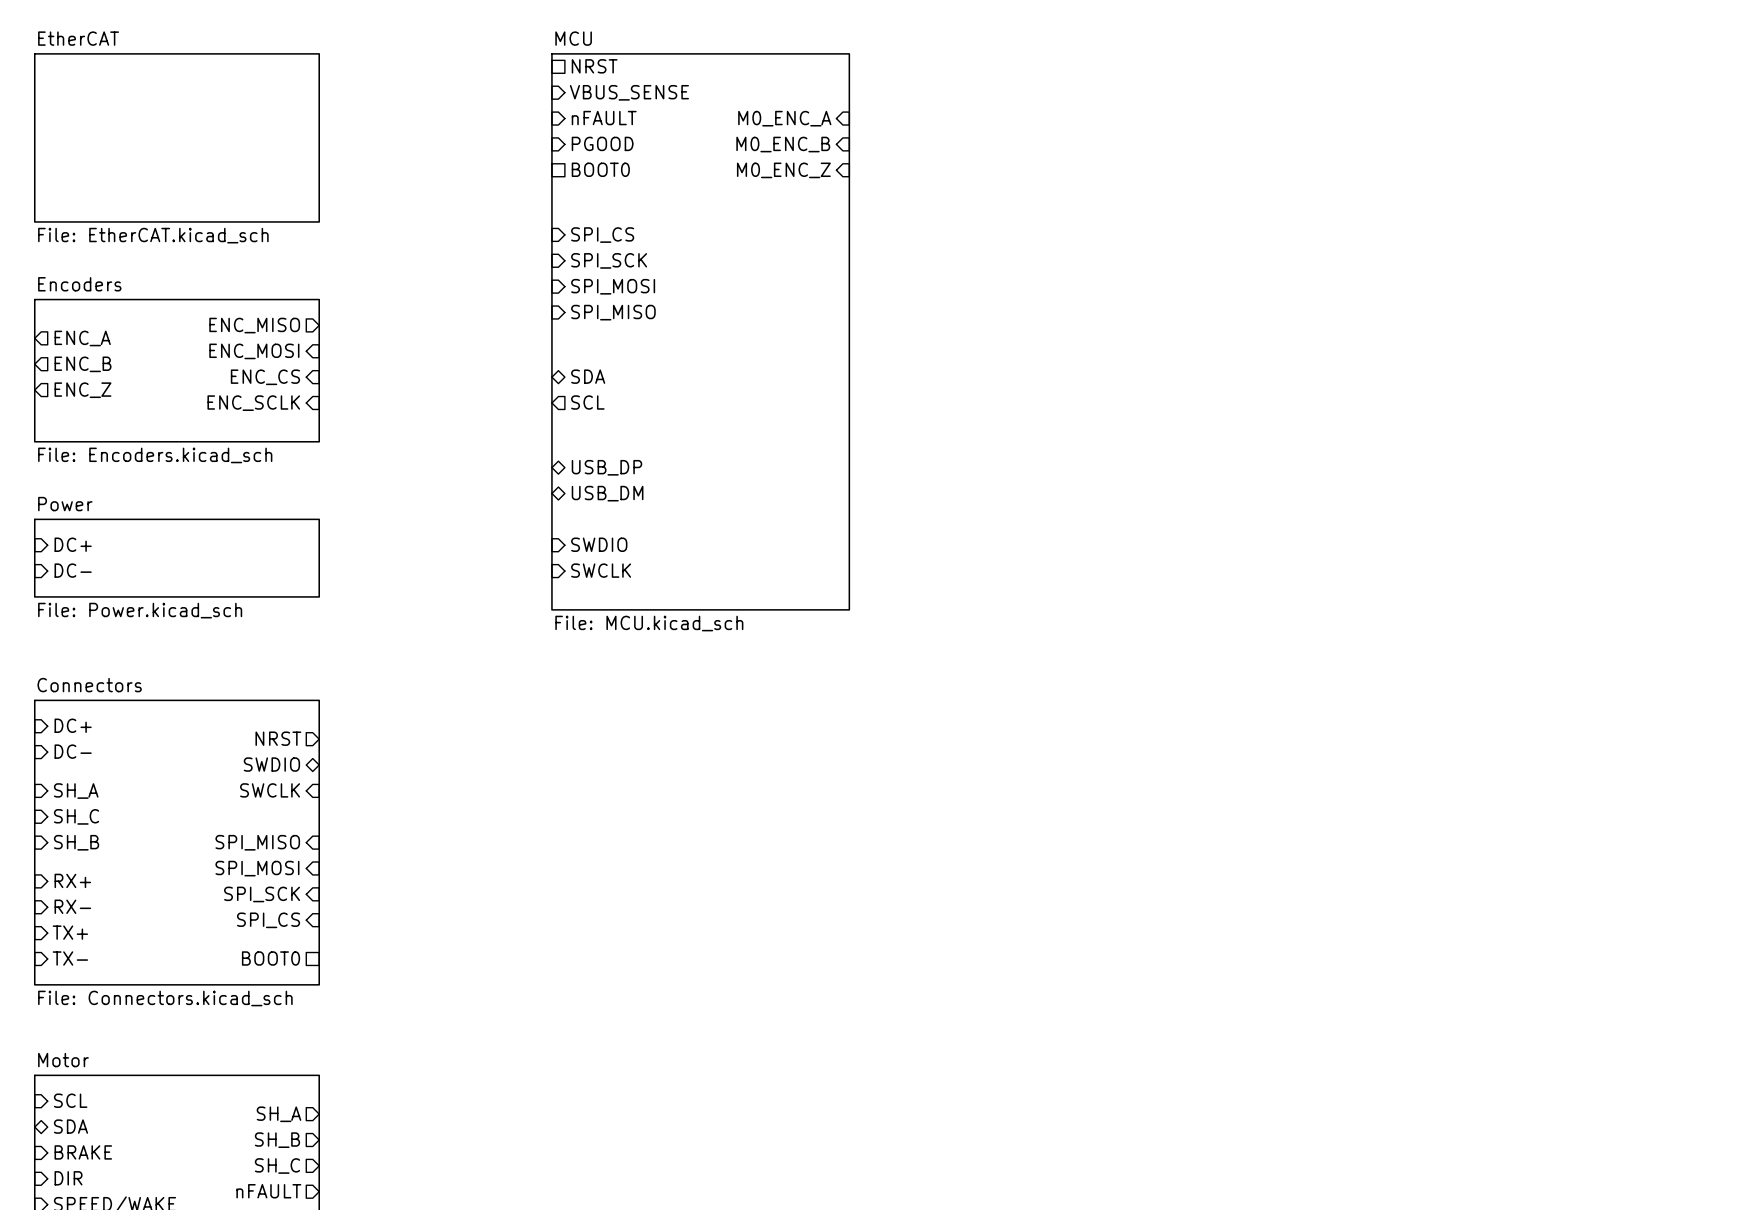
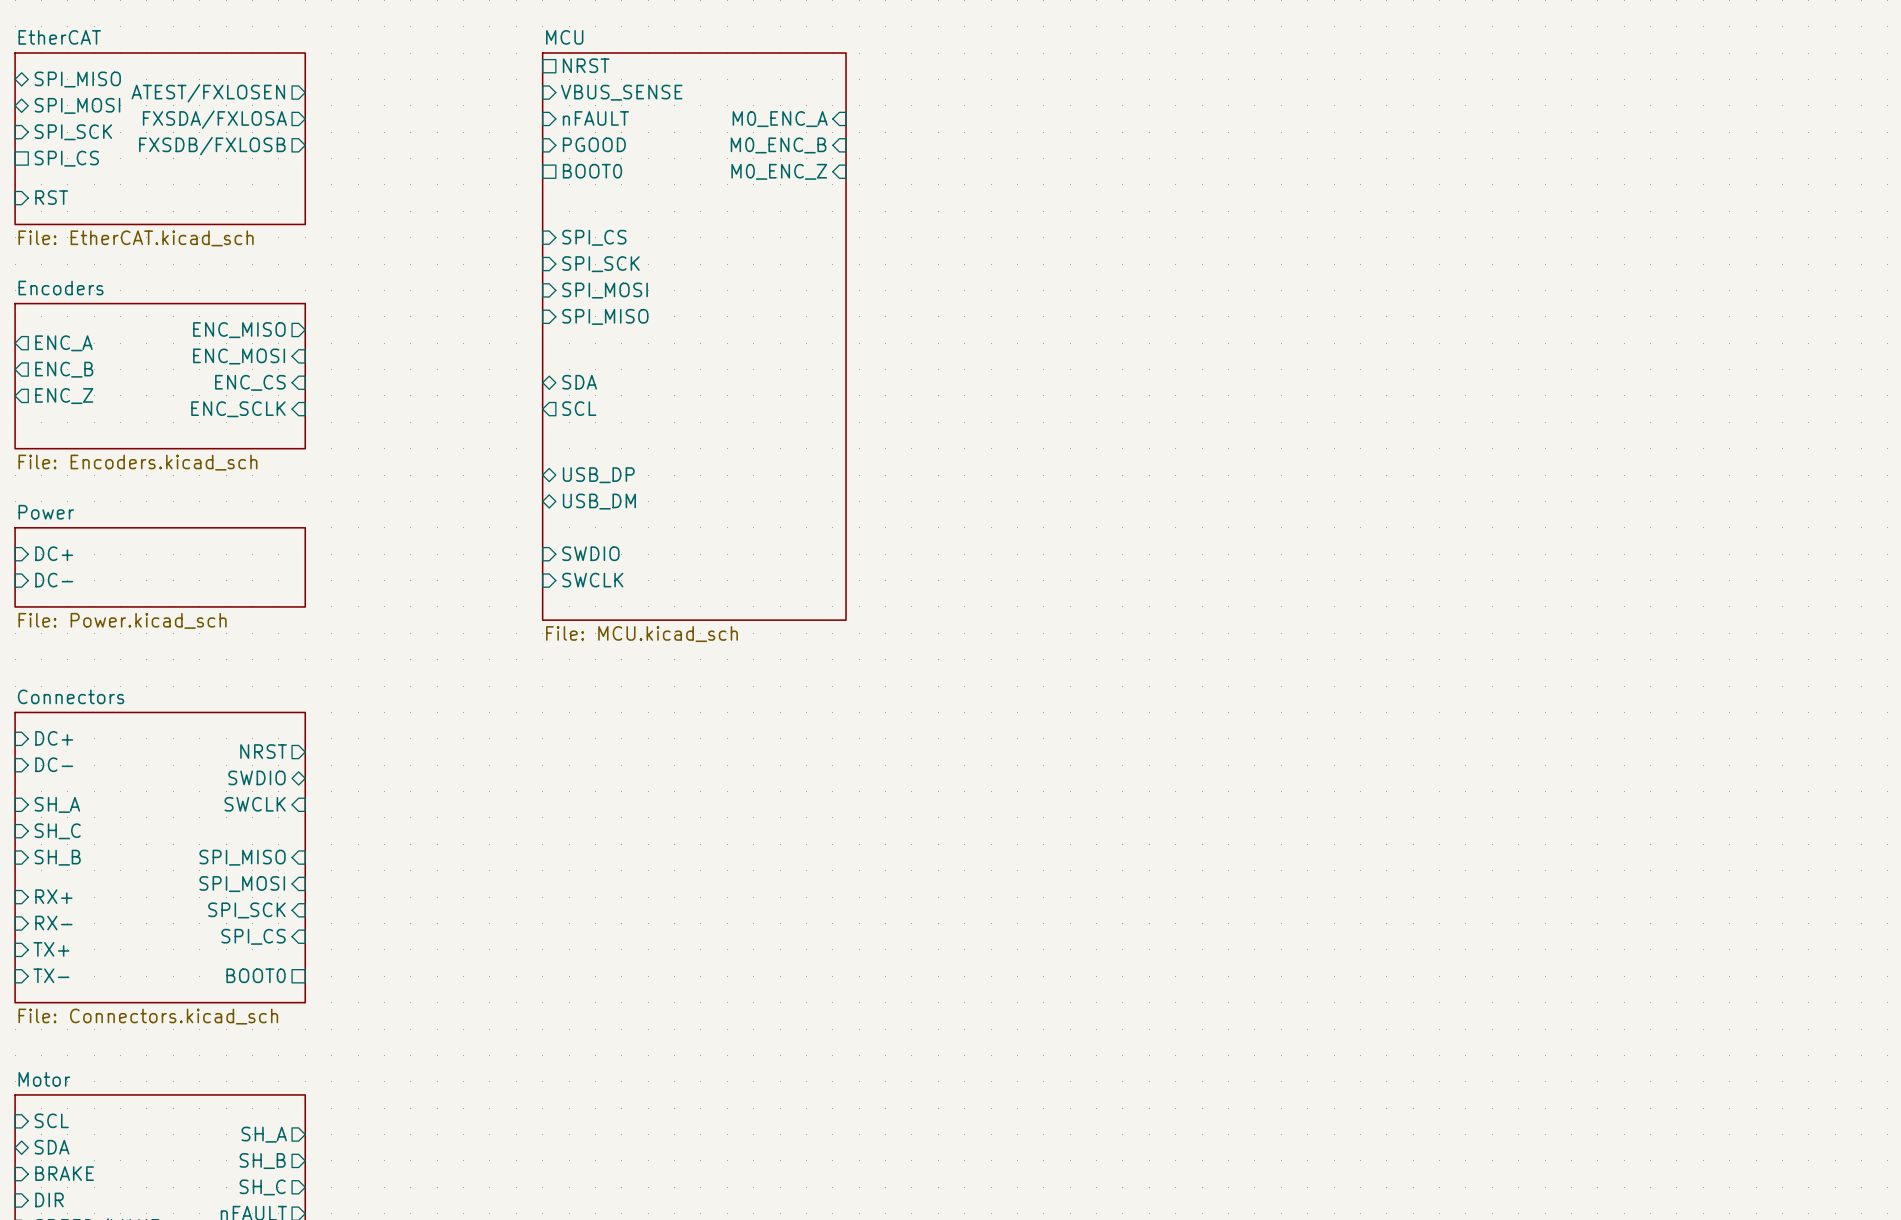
sheet pin: none -> SPI_MISO (77, 79)
sheet pin: none -> ATEST/FXLOSEN (208, 93)
sheet pin: none -> SPI_MOSI (77, 105)
sheet pin: none -> FXSDA/FXLOSA (214, 119)
sheet pin: none -> SPI_SCK (73, 132)
sheet pin: none -> FXSDB/FXLOSB (212, 146)
sheet pin: none -> SPI_CS (66, 158)
sheet pin: none -> RST (51, 197)

